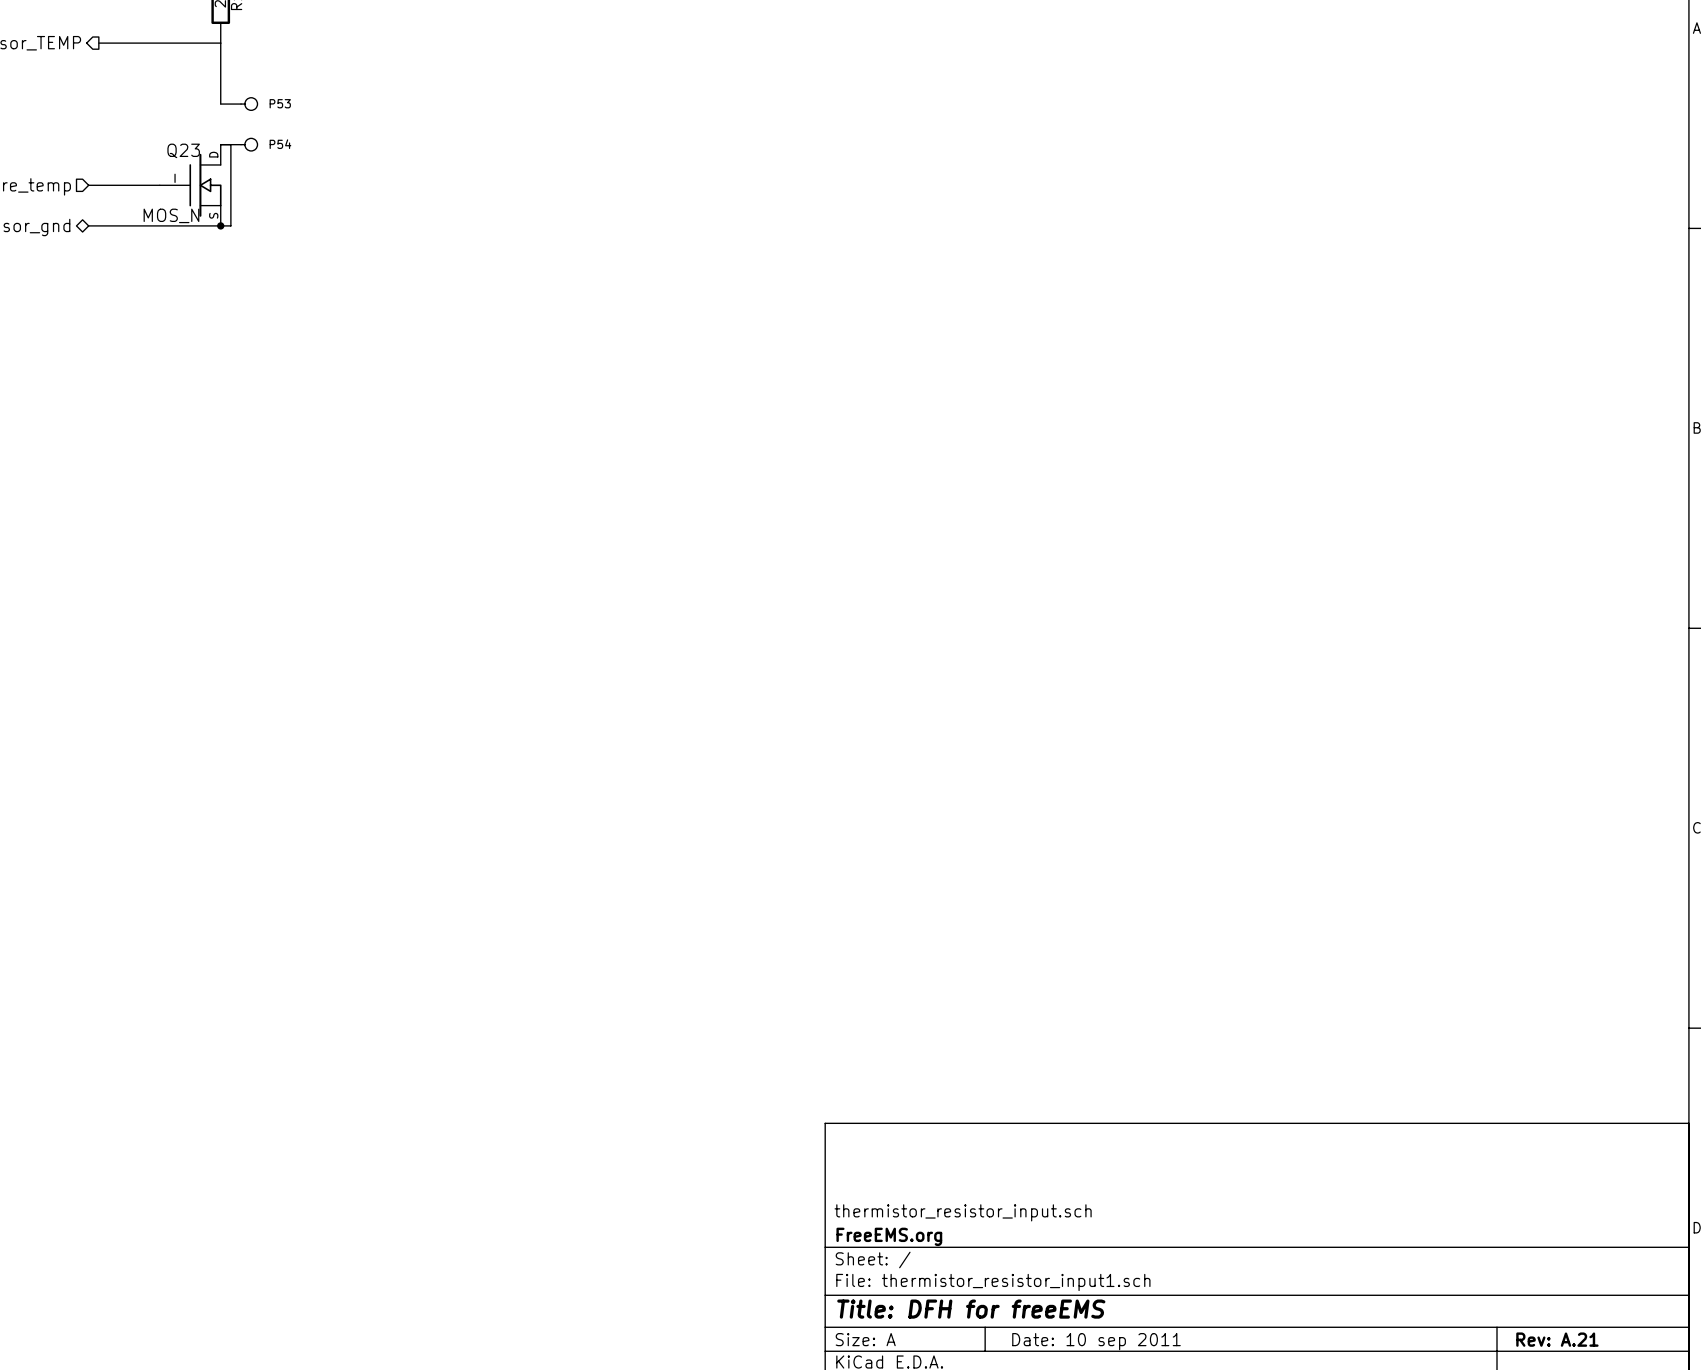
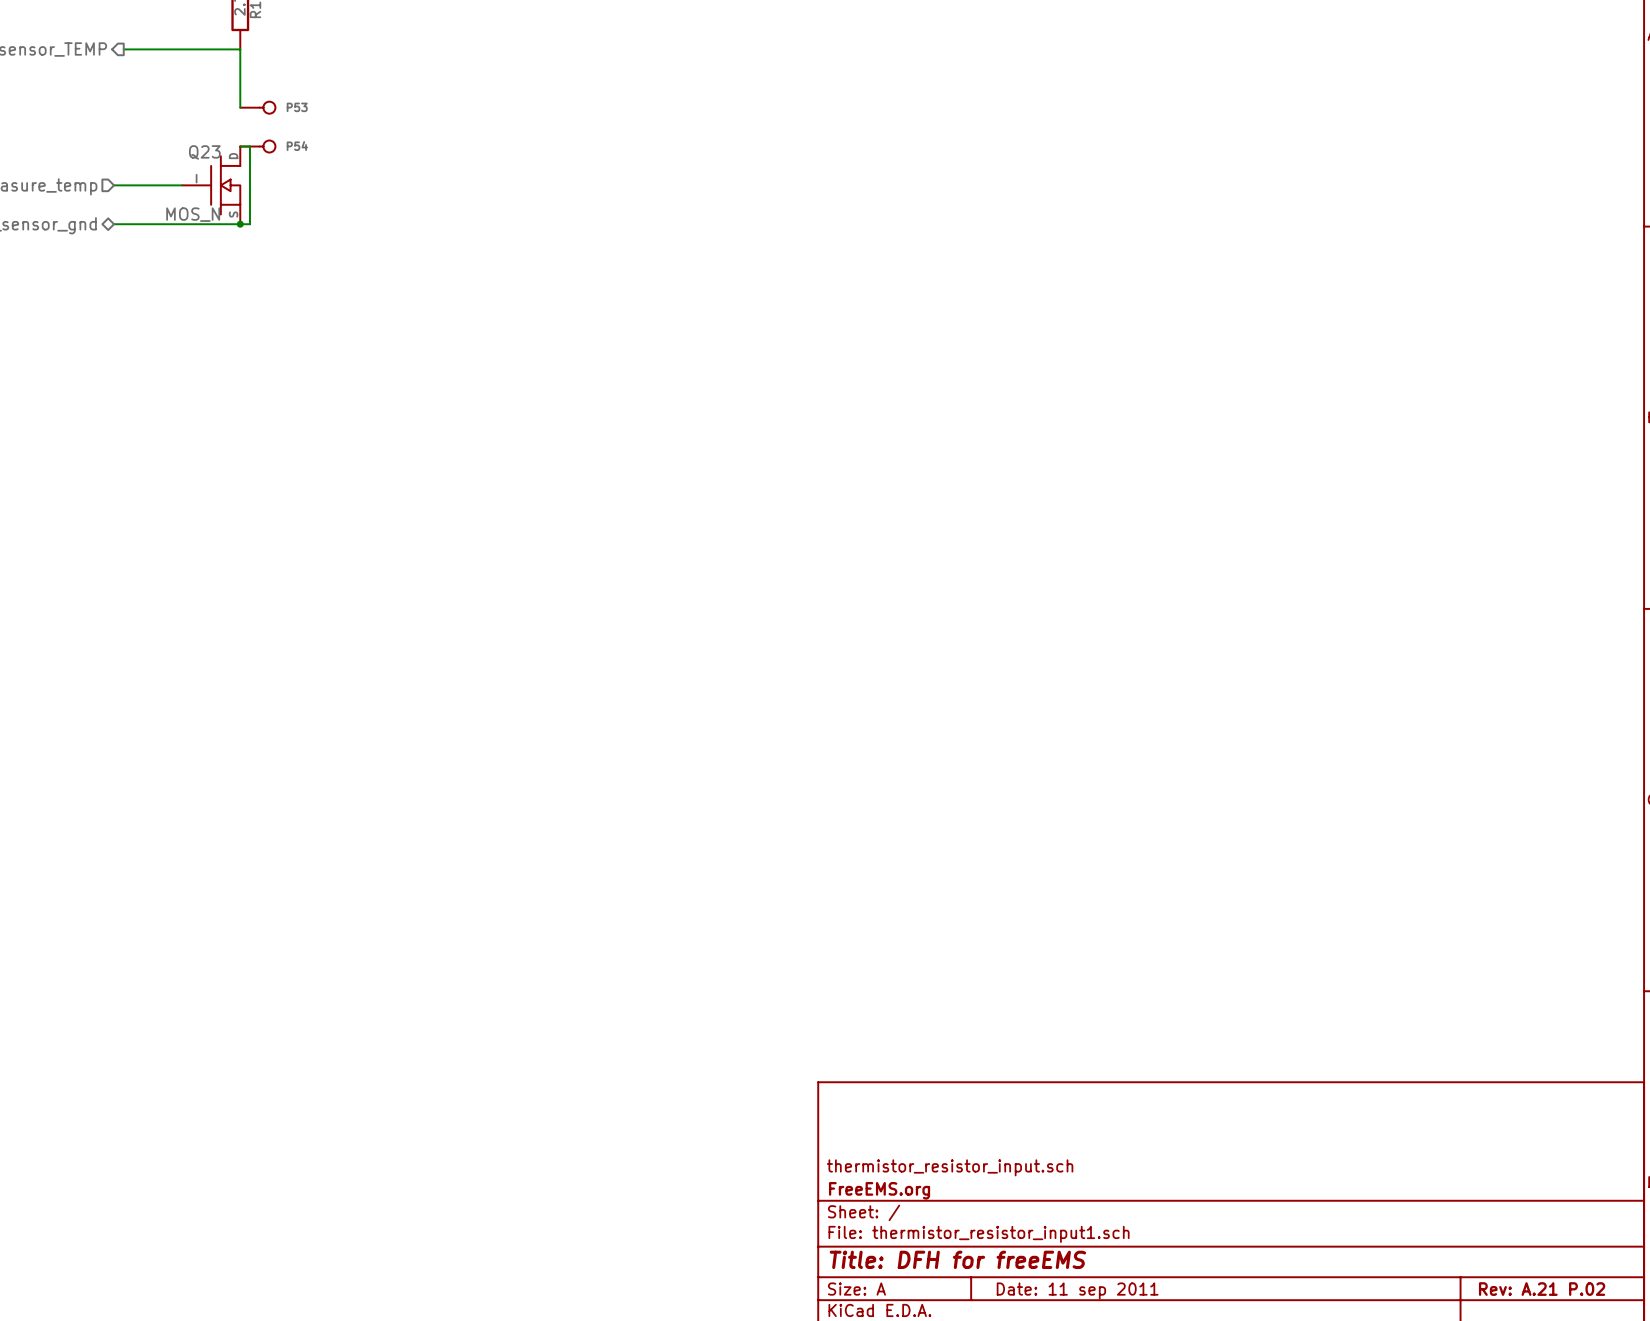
title block: Rev: A.21 (1557, 1339) -> Rev: A.21 P.02 (1542, 1289)
title block: Date: 10 sep 2011 (1096, 1341) -> Date: 11 sep 2011 (1077, 1290)

